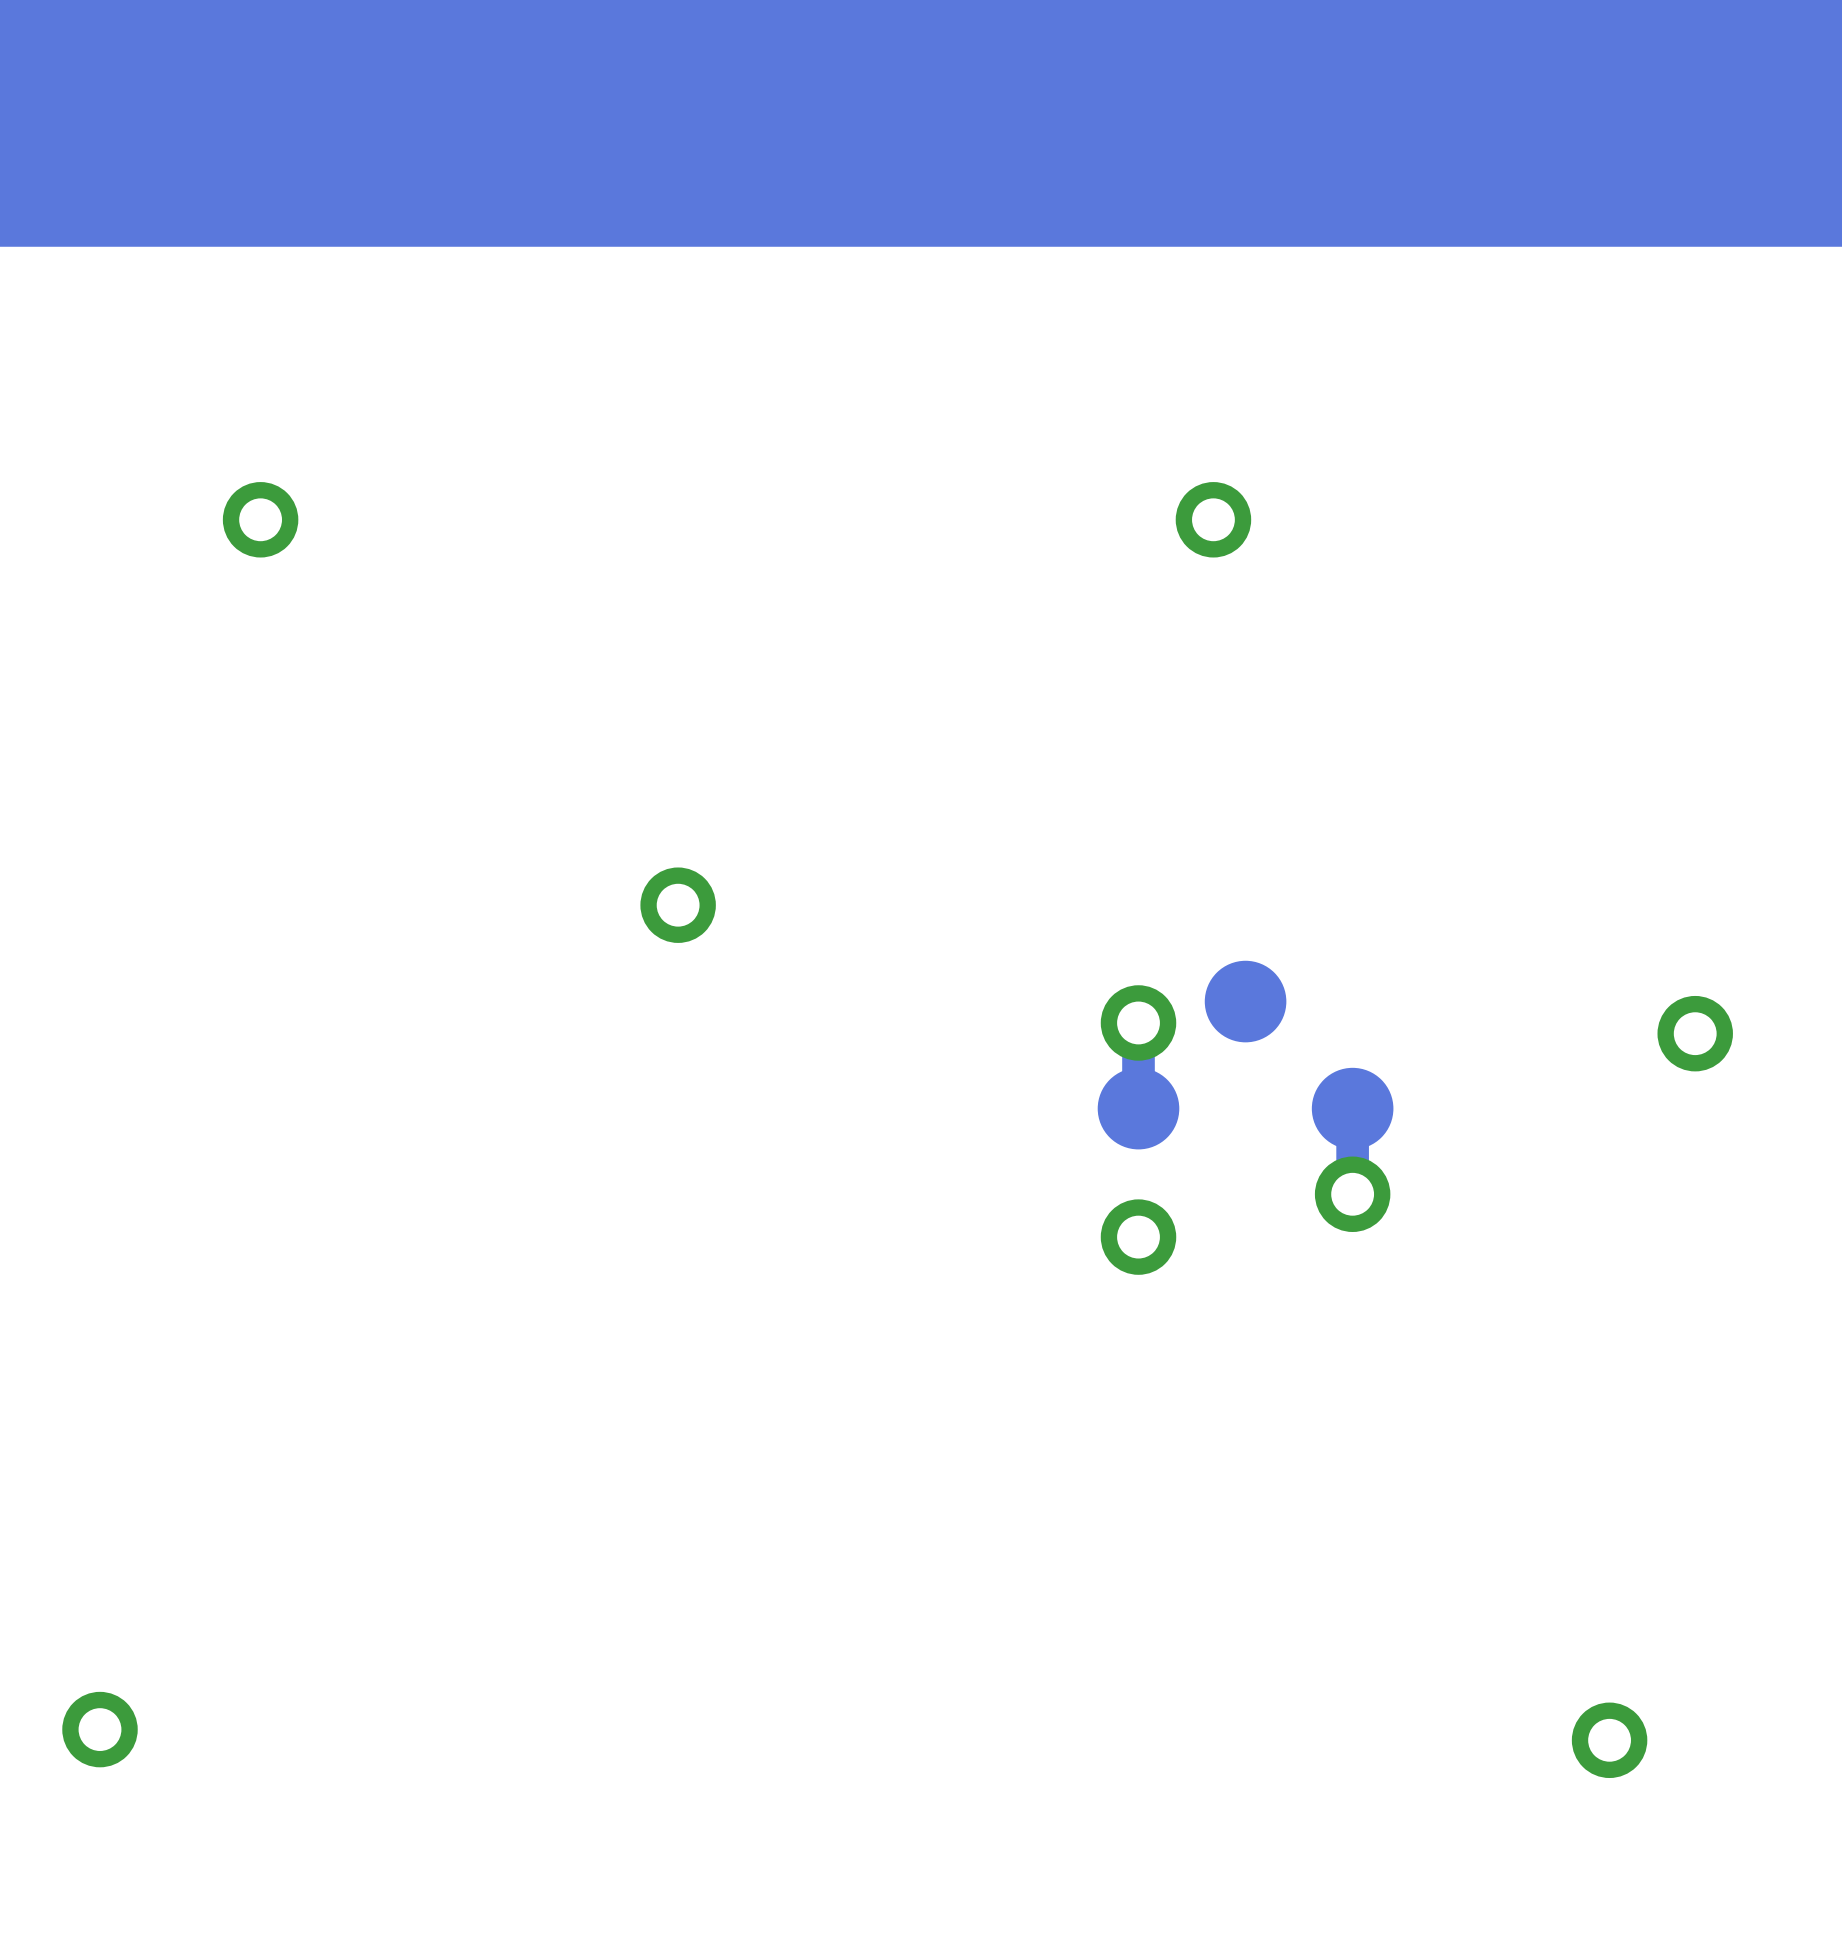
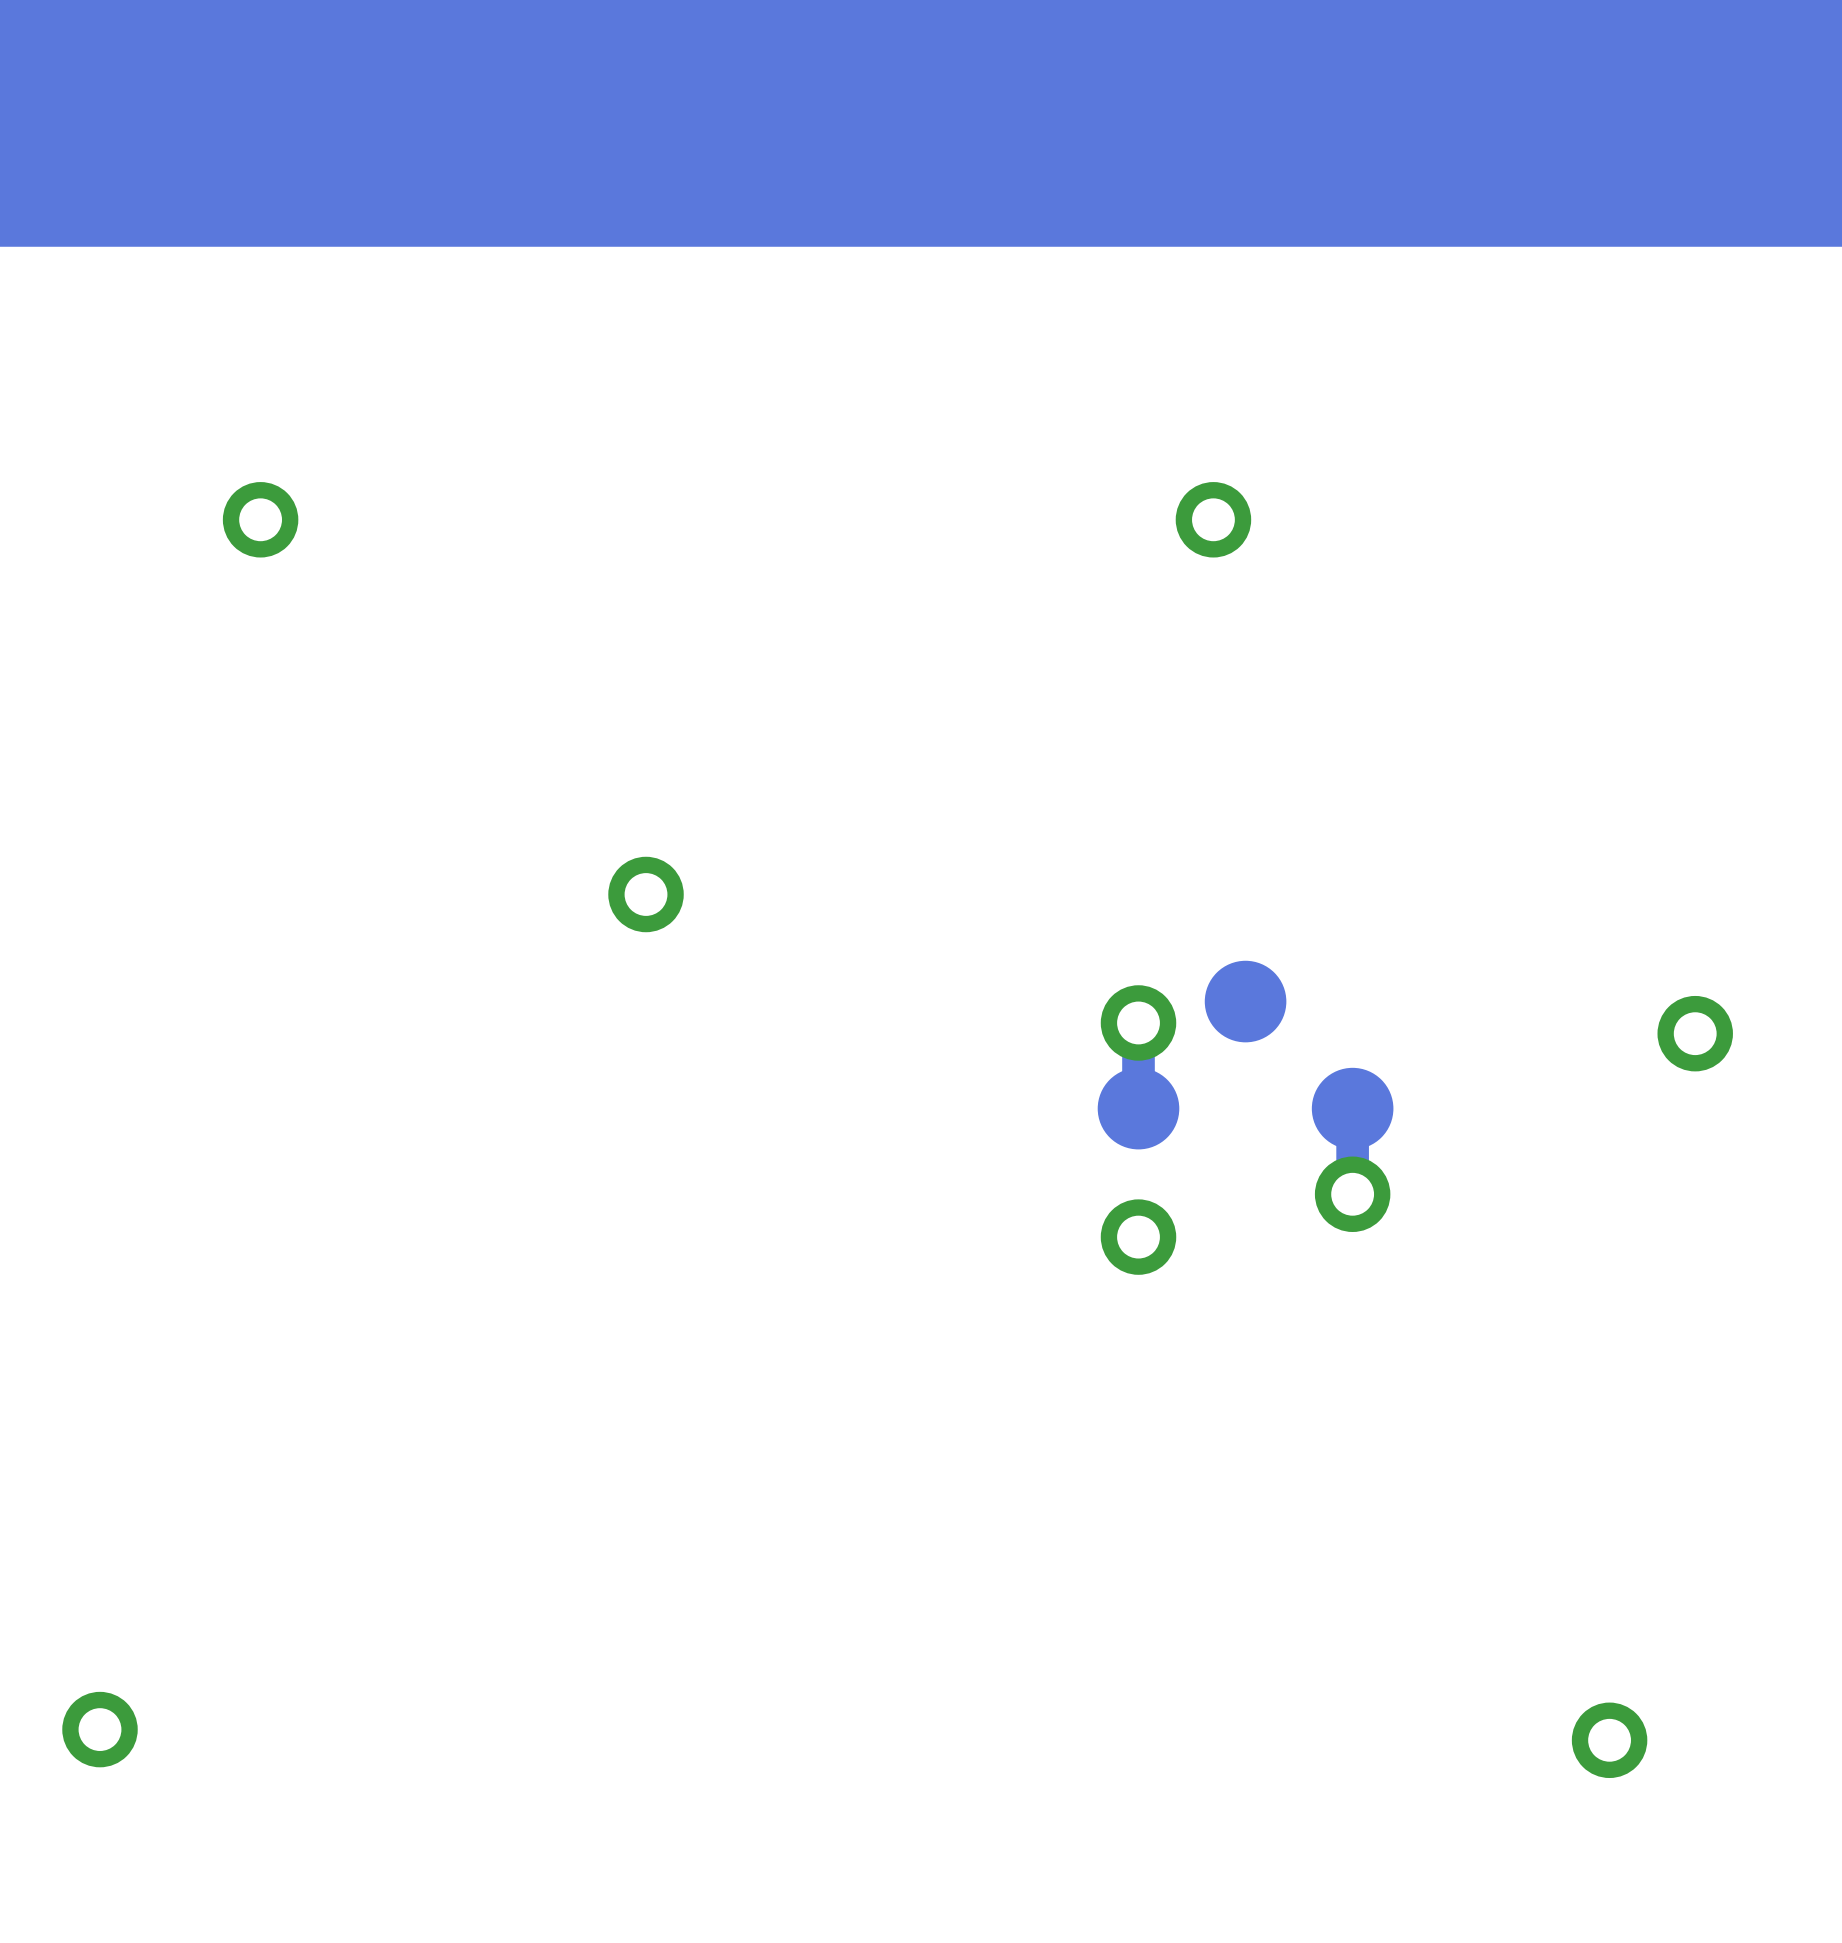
part position: (678, 905) -> (646, 894)

